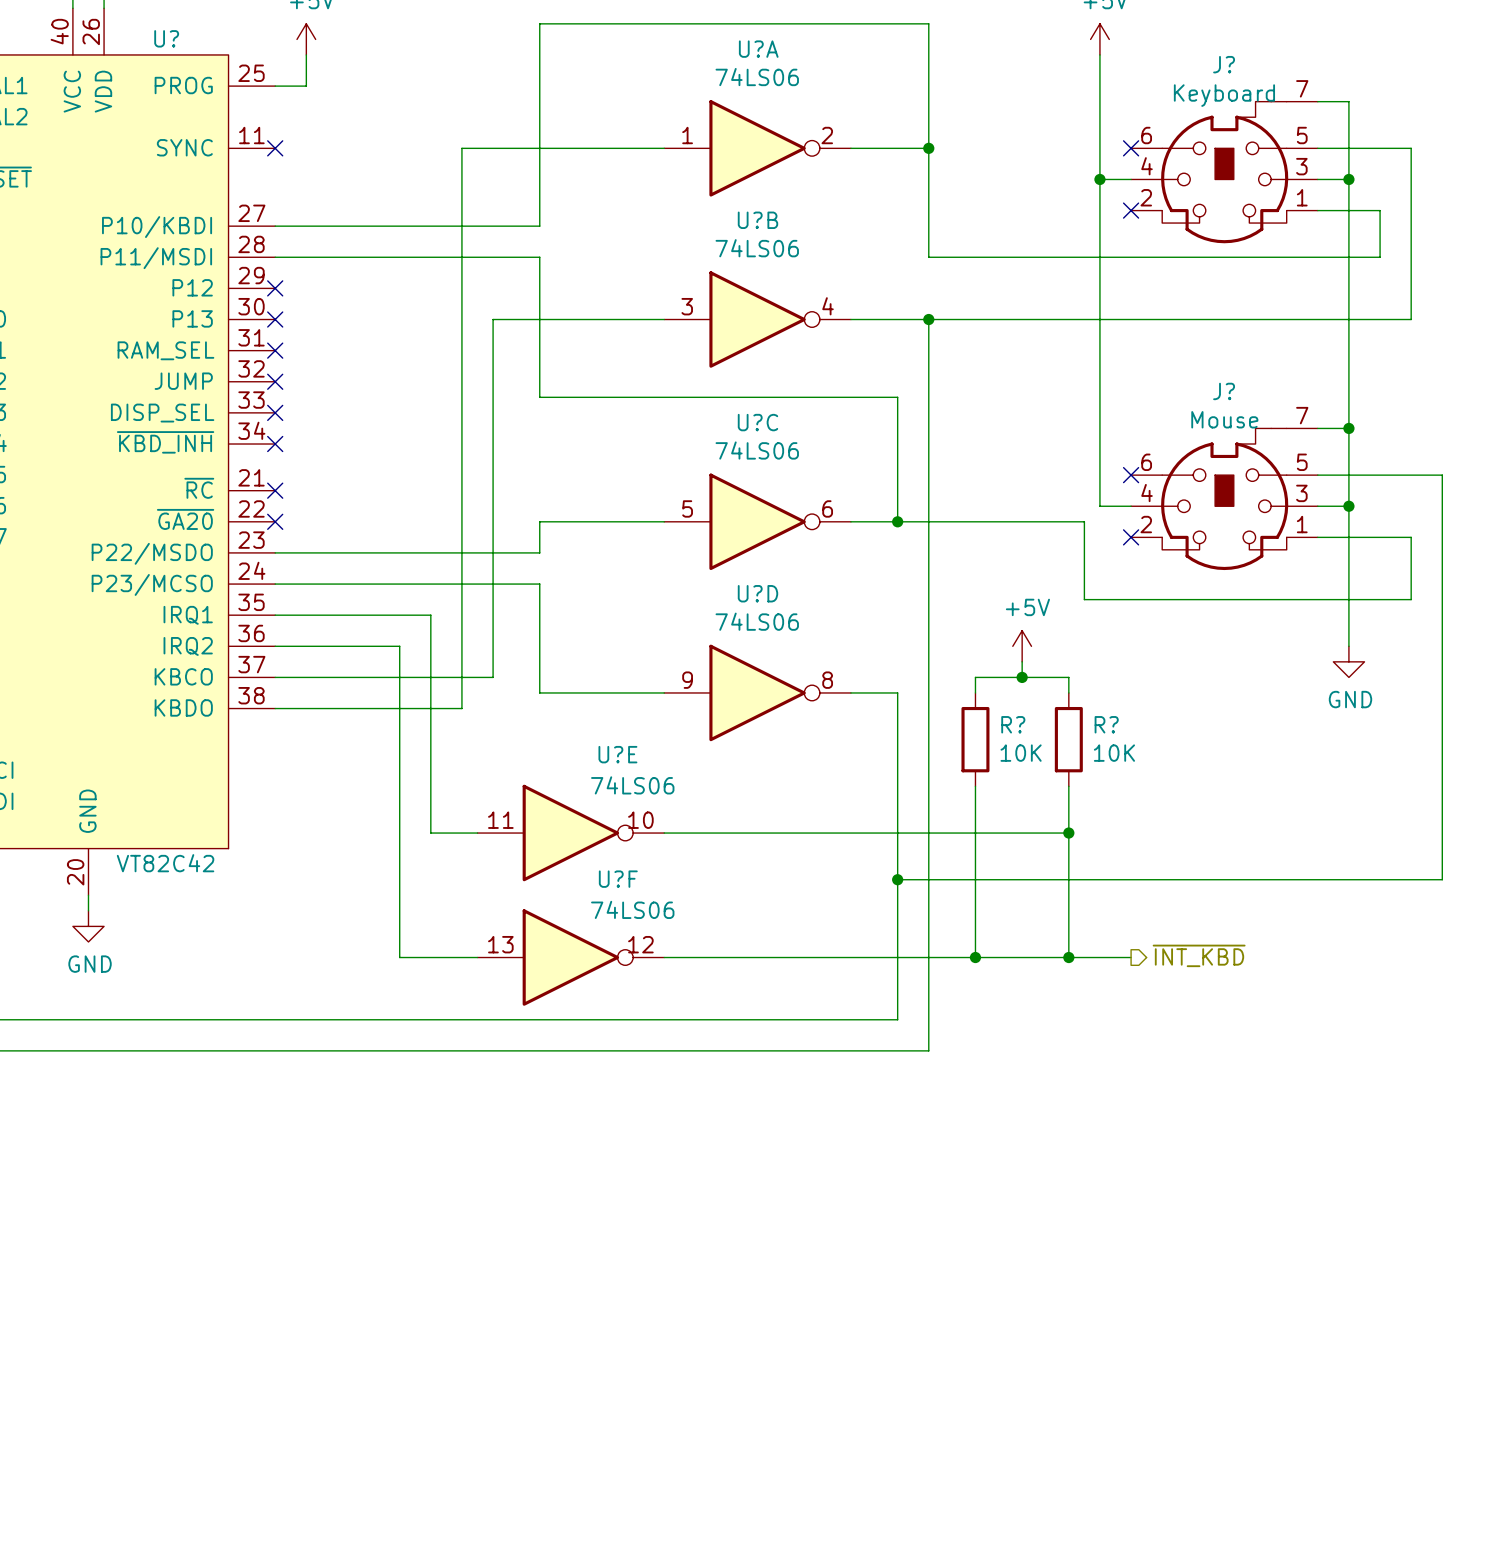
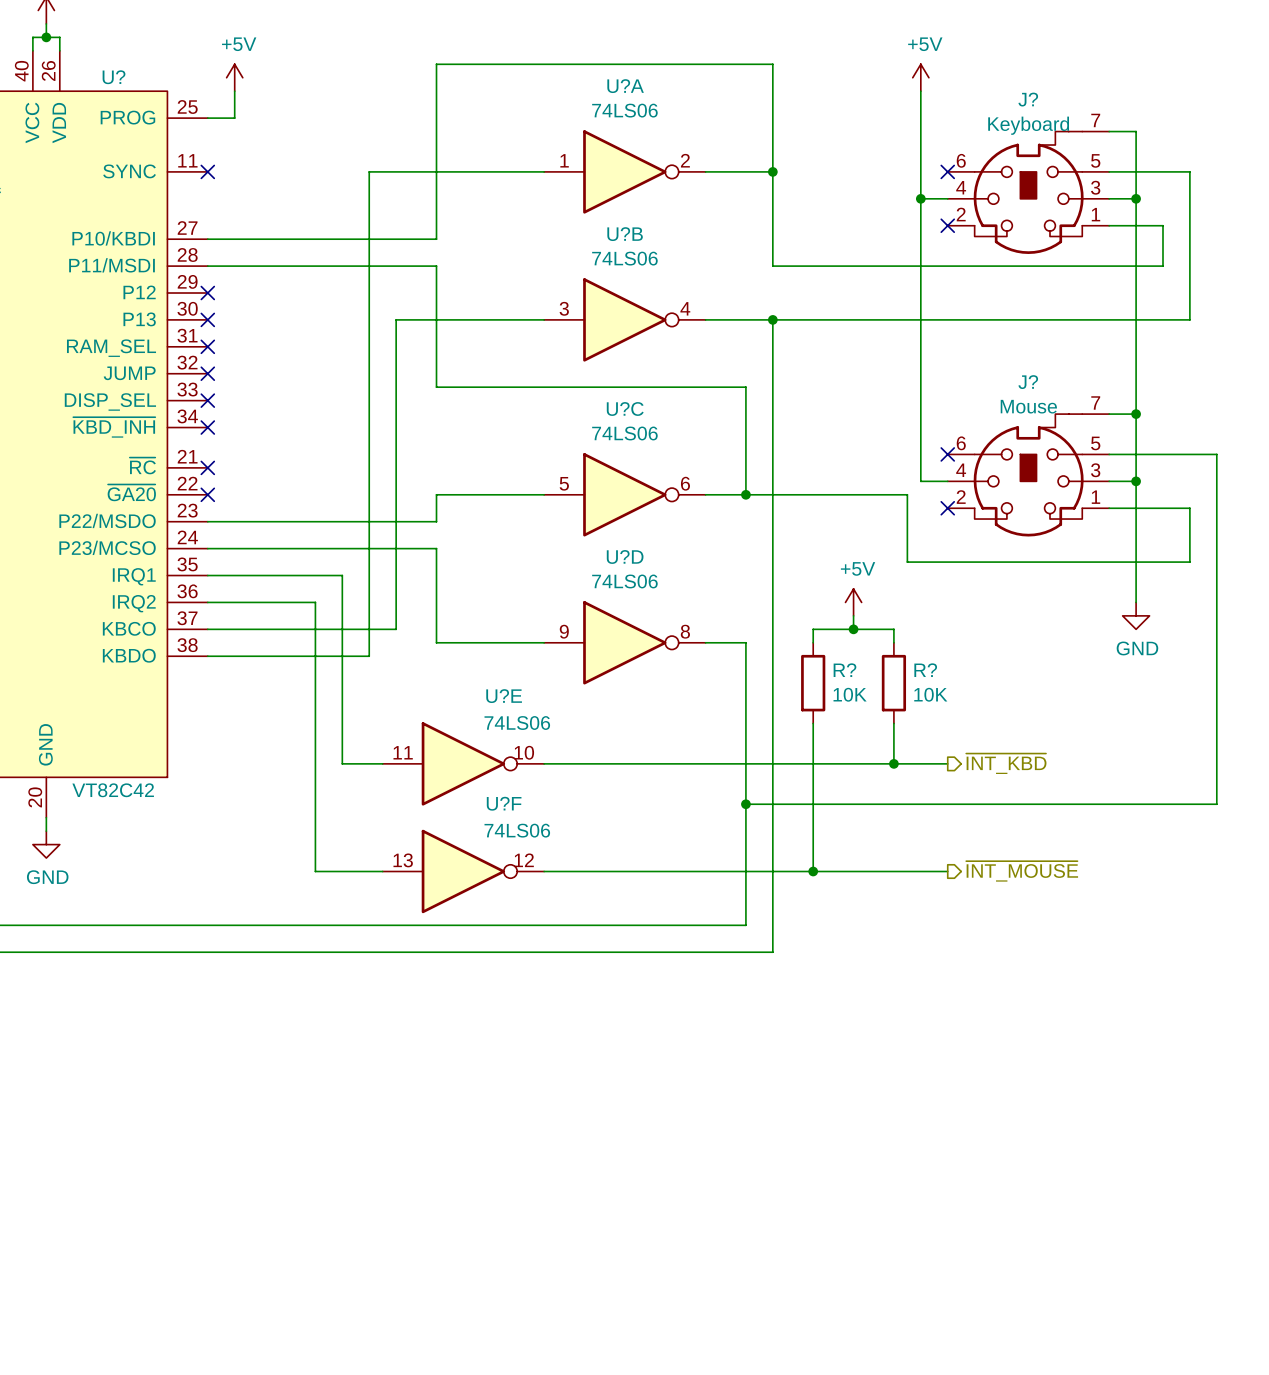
hierarchical label: none -> ~{INT_KBD} (1006, 763)
wire: (1068, 833) (1068, 957) -> (893, 763) (947, 763)
hierarchical label: ~{INT_KBD} (1199, 955) -> ~{INT_MOUSE} (1022, 871)
junction: (1068, 957) -> none

